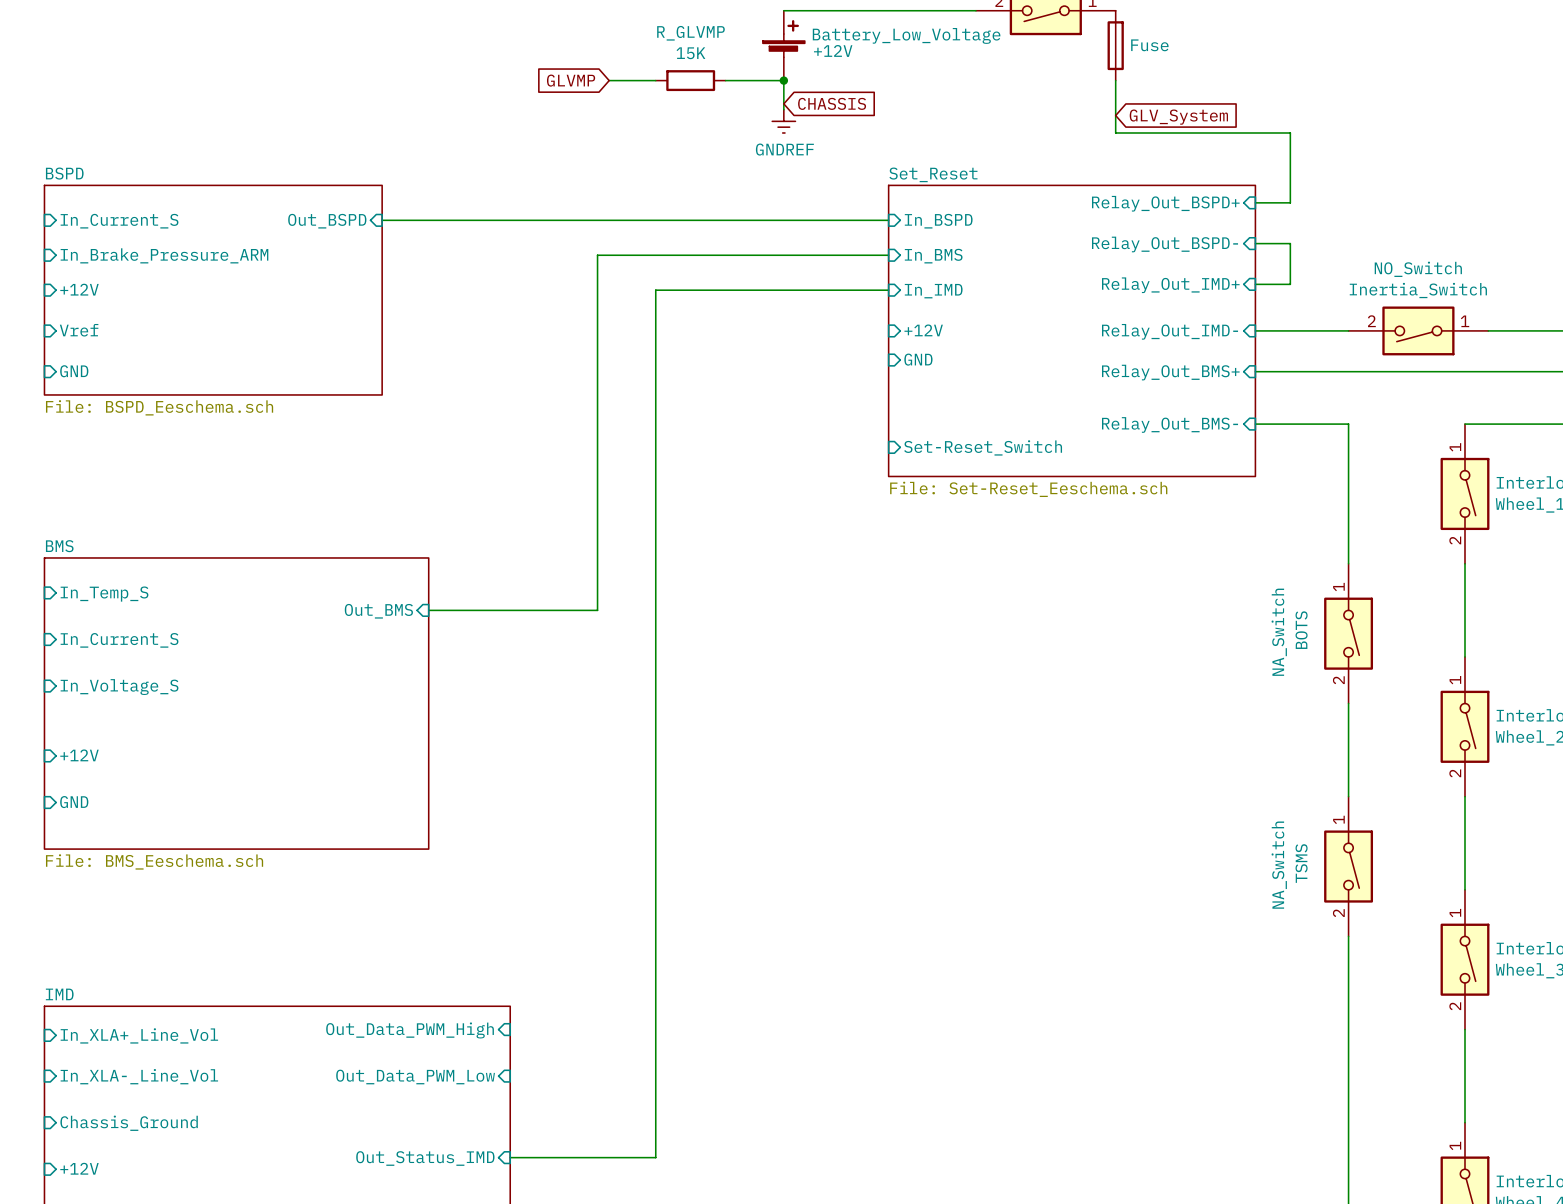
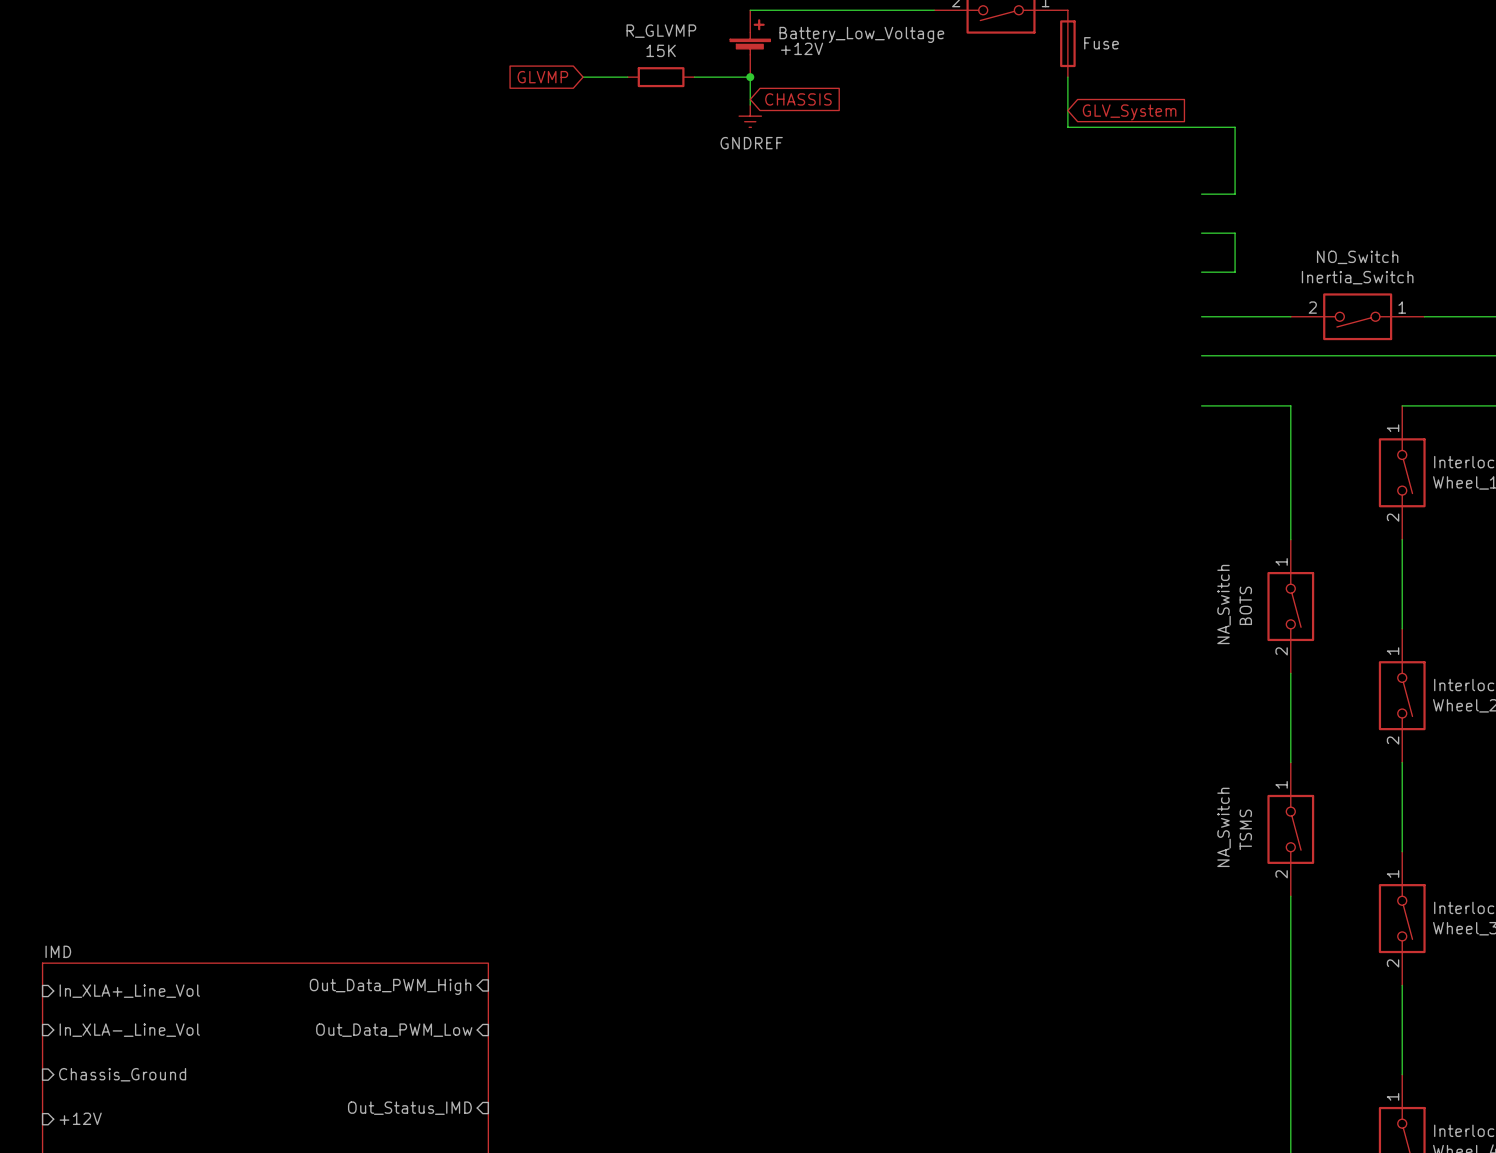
sheet pin: Relay_Out_BSPD+ (1165, 203) -> none
wire: (382, 220) (888, 220) -> none
sheet pin: In_Current_S (119, 221) -> none
sheet pin: Out_BSPD (327, 221) -> none
sheet pin: In_BSPD (938, 221) -> none
sheet pin: Relay_Out_BSPD- (1165, 244) -> none
sheet pin: In_Brake_Pressure_ARM (164, 255) -> none
wire: (888, 255) (597, 255) (597, 610) (428, 610) -> none
sheet pin: In_BMS (933, 256) -> none
sheet pin: Relay_Out_IMD+ (1170, 285) -> none
sheet pin: +12V (79, 289) -> none
sheet BSPD: File: BSPD_Eeschema.sch (213, 290) -> none
wire: (888, 290) (655, 290) (655, 1157) (510, 1157) -> none
sheet pin: In_IMD (933, 291) -> none
sheet pin: Vref (79, 330) -> none
sheet pin: +12V (923, 330) -> none
sheet Set_Reset: File: Set-Reset_Eeschema.sch (1072, 330) -> none
sheet pin: Relay_Out_IMD- (1170, 331) -> none
sheet pin: GND (918, 359) -> none
sheet pin: GND (74, 371) -> none
sheet pin: Relay_Out_BMS+ (1170, 372) -> none
sheet pin: Relay_Out_BMS- (1170, 424) -> none
sheet pin: Set-Reset_Switch (983, 447) -> none
sheet pin: In_Temp_S (104, 594) -> none
sheet pin: Out_BMS (378, 611) -> none
sheet pin: In_Current_S (119, 640) -> none
sheet pin: In_Voltage_S (119, 687) -> none
sheet BMS: File: BMS_Eeschema.sch (236, 703) -> none
sheet pin: +12V (79, 755) -> none
sheet pin: GND (74, 802) -> none

